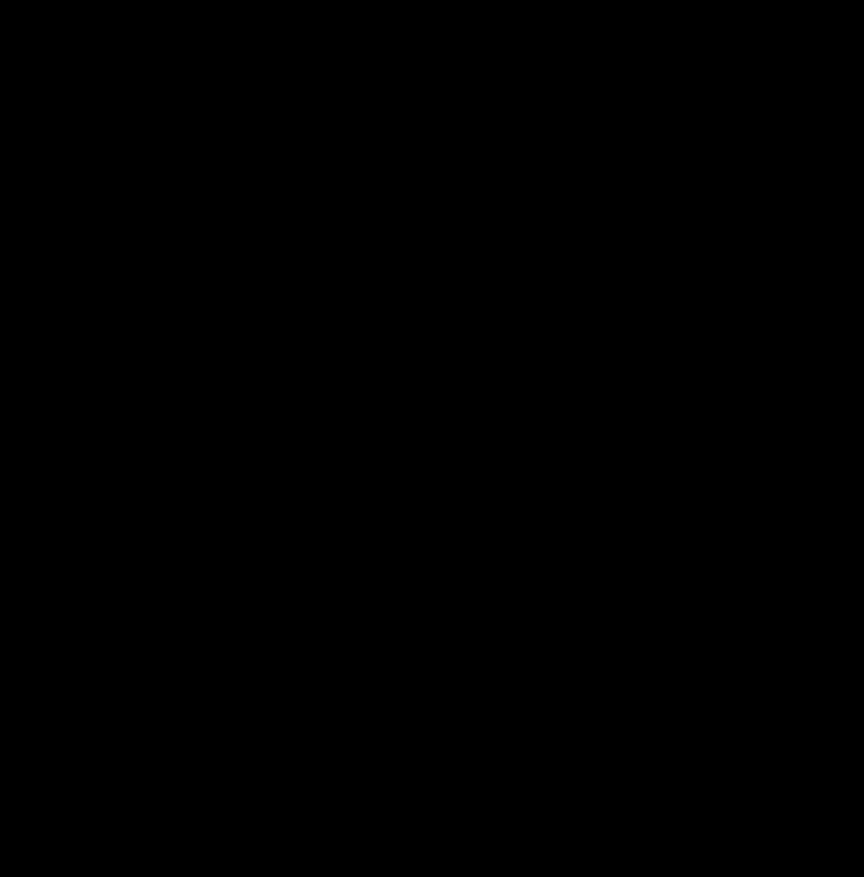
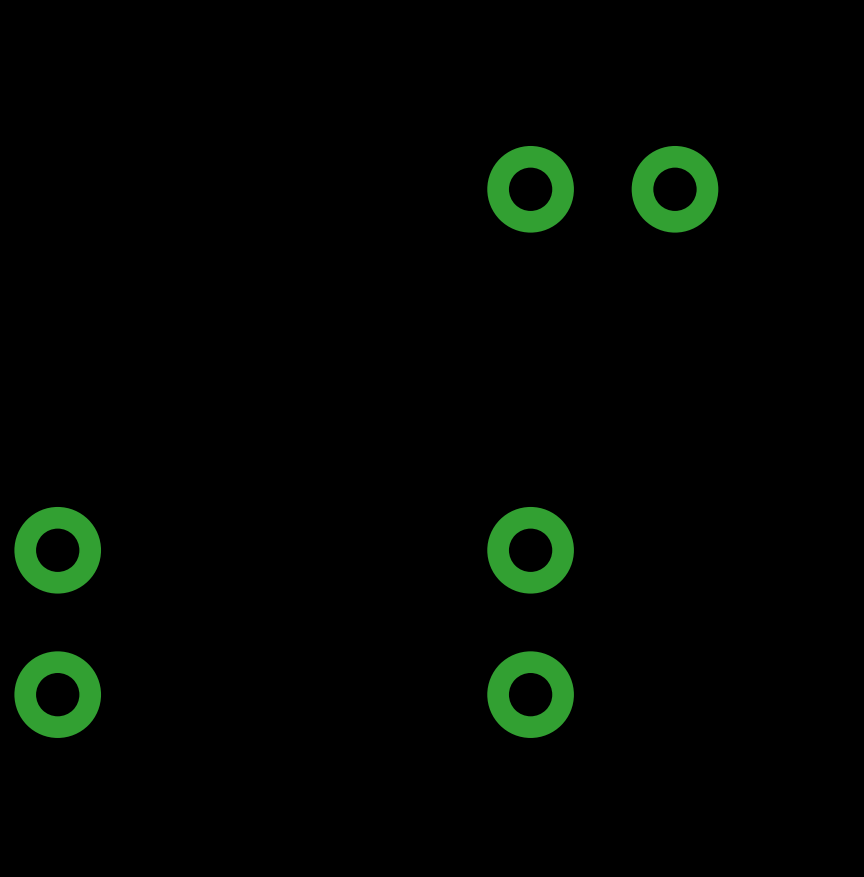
part: none -> (602, 189)
part: none -> (57, 622)
part: none -> (530, 622)

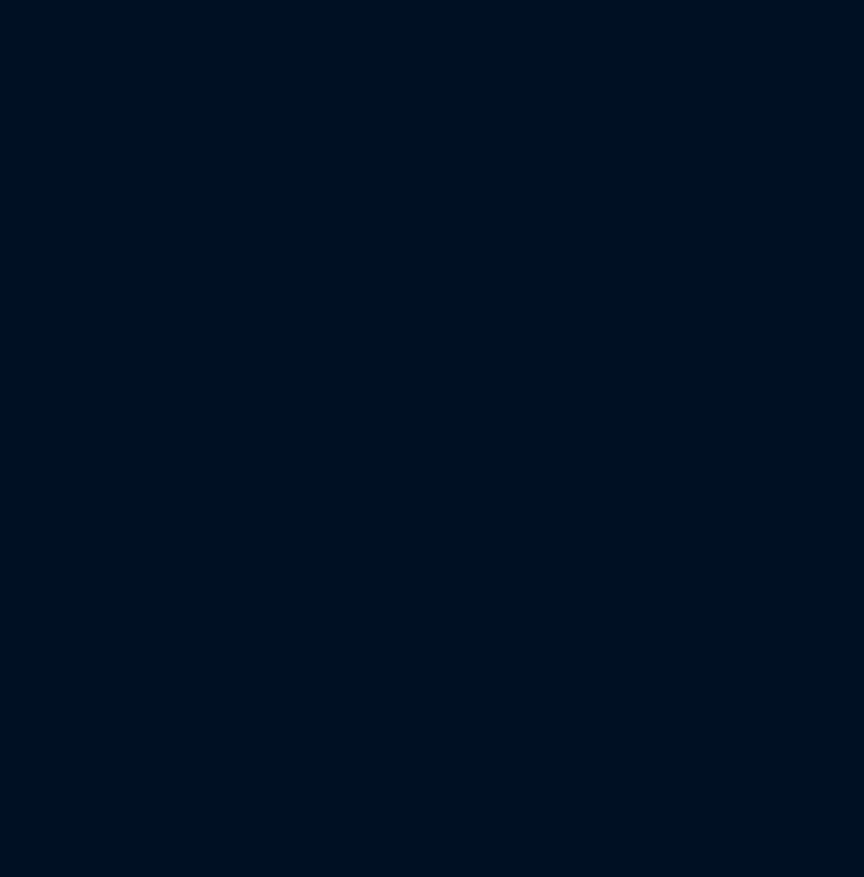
part: (602, 189) -> none
part: (57, 622) -> none
part: (530, 622) -> none

